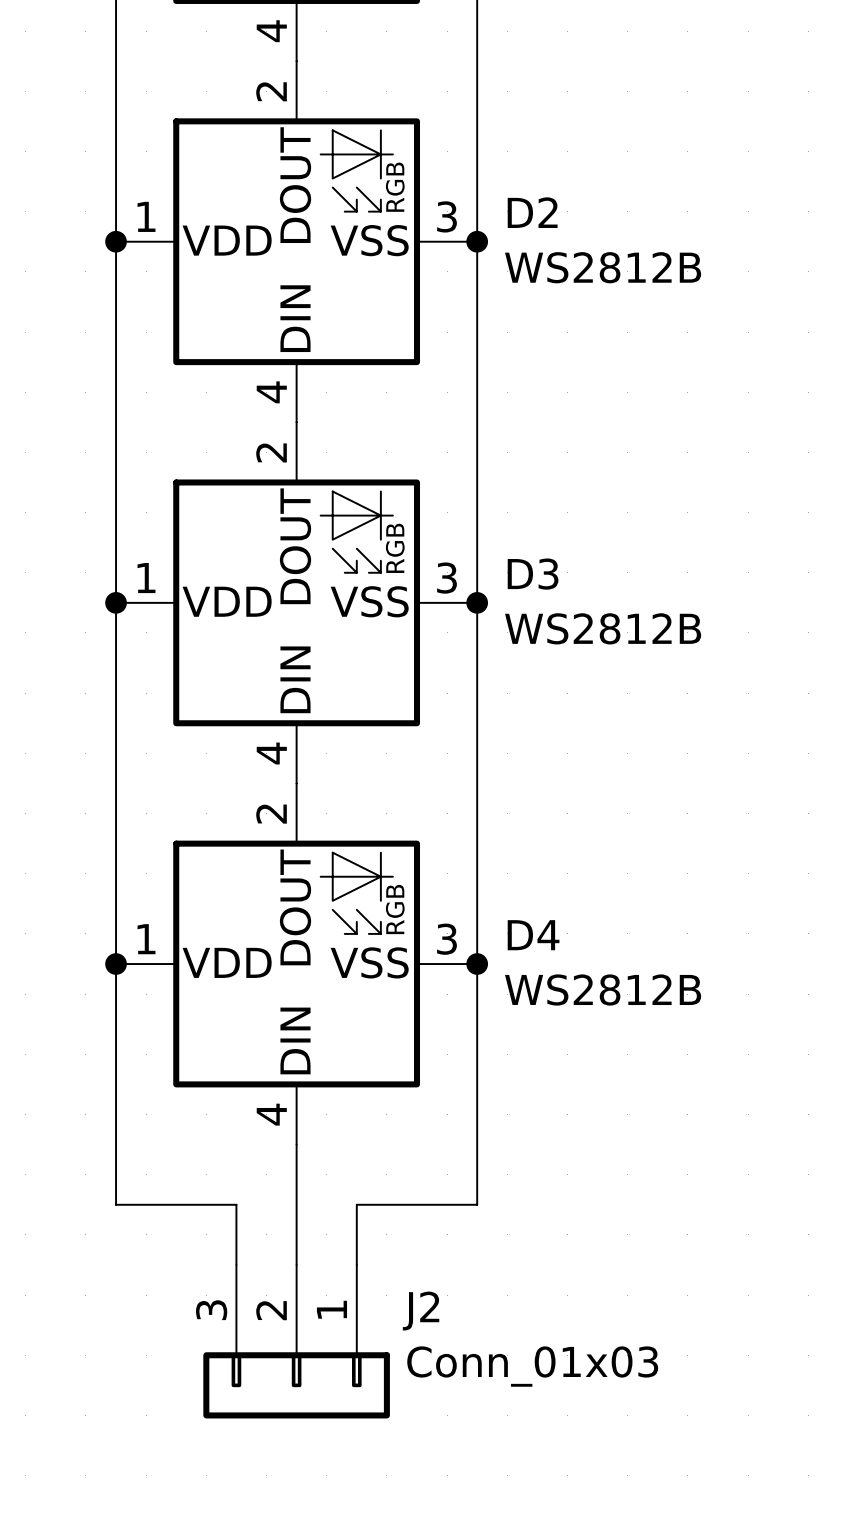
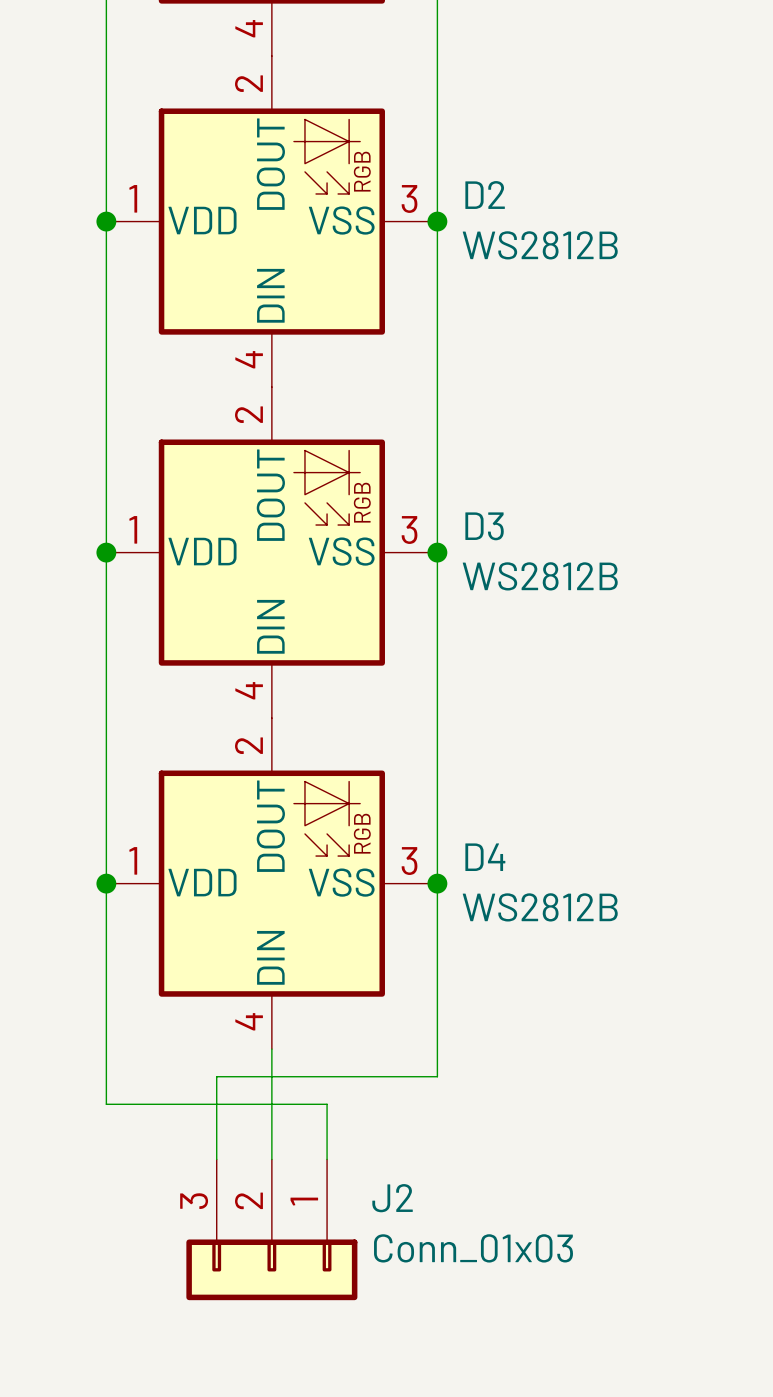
wire: (477, 1174) (477, 1204) (356, 1204) -> (437, 1076) (216, 1076) (216, 1104) (327, 1104)

